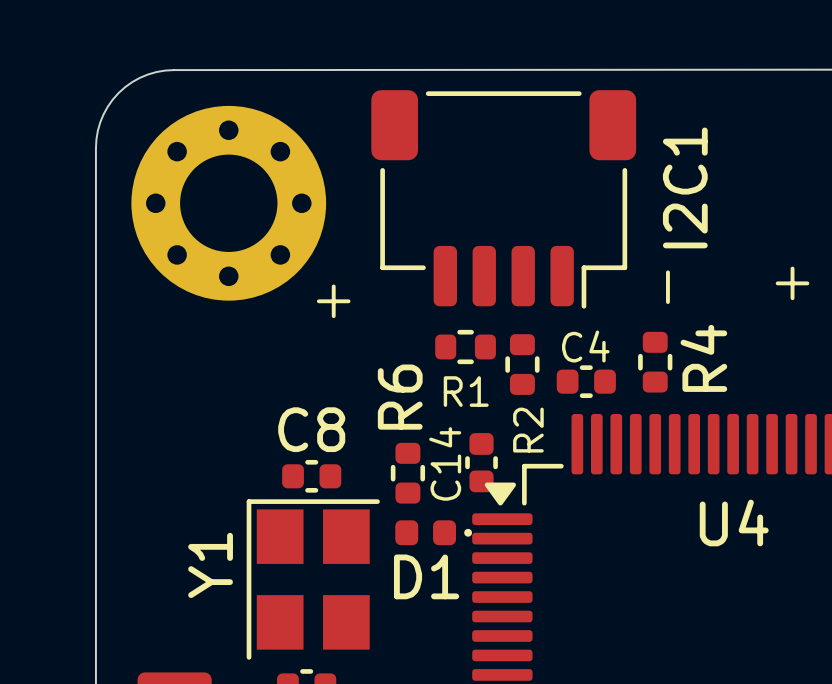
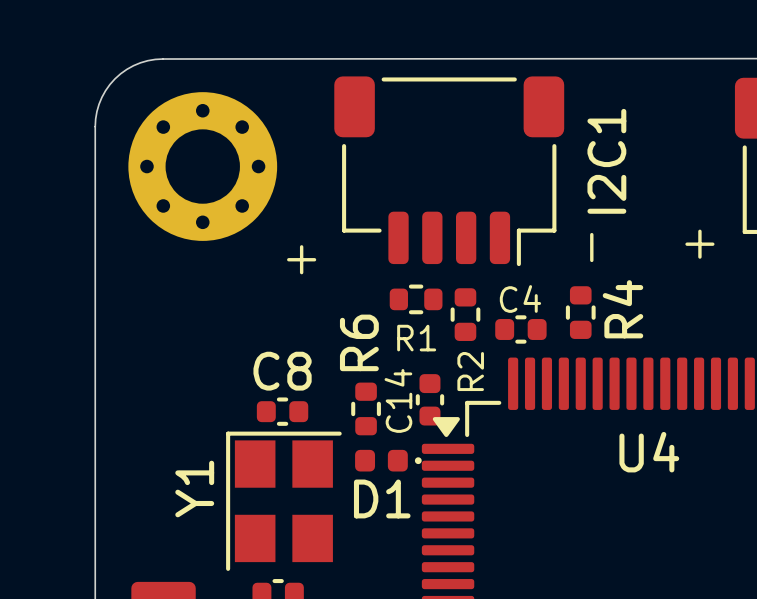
part footprint: [131, 105, 327, 301] -> [128, 92, 278, 241]

